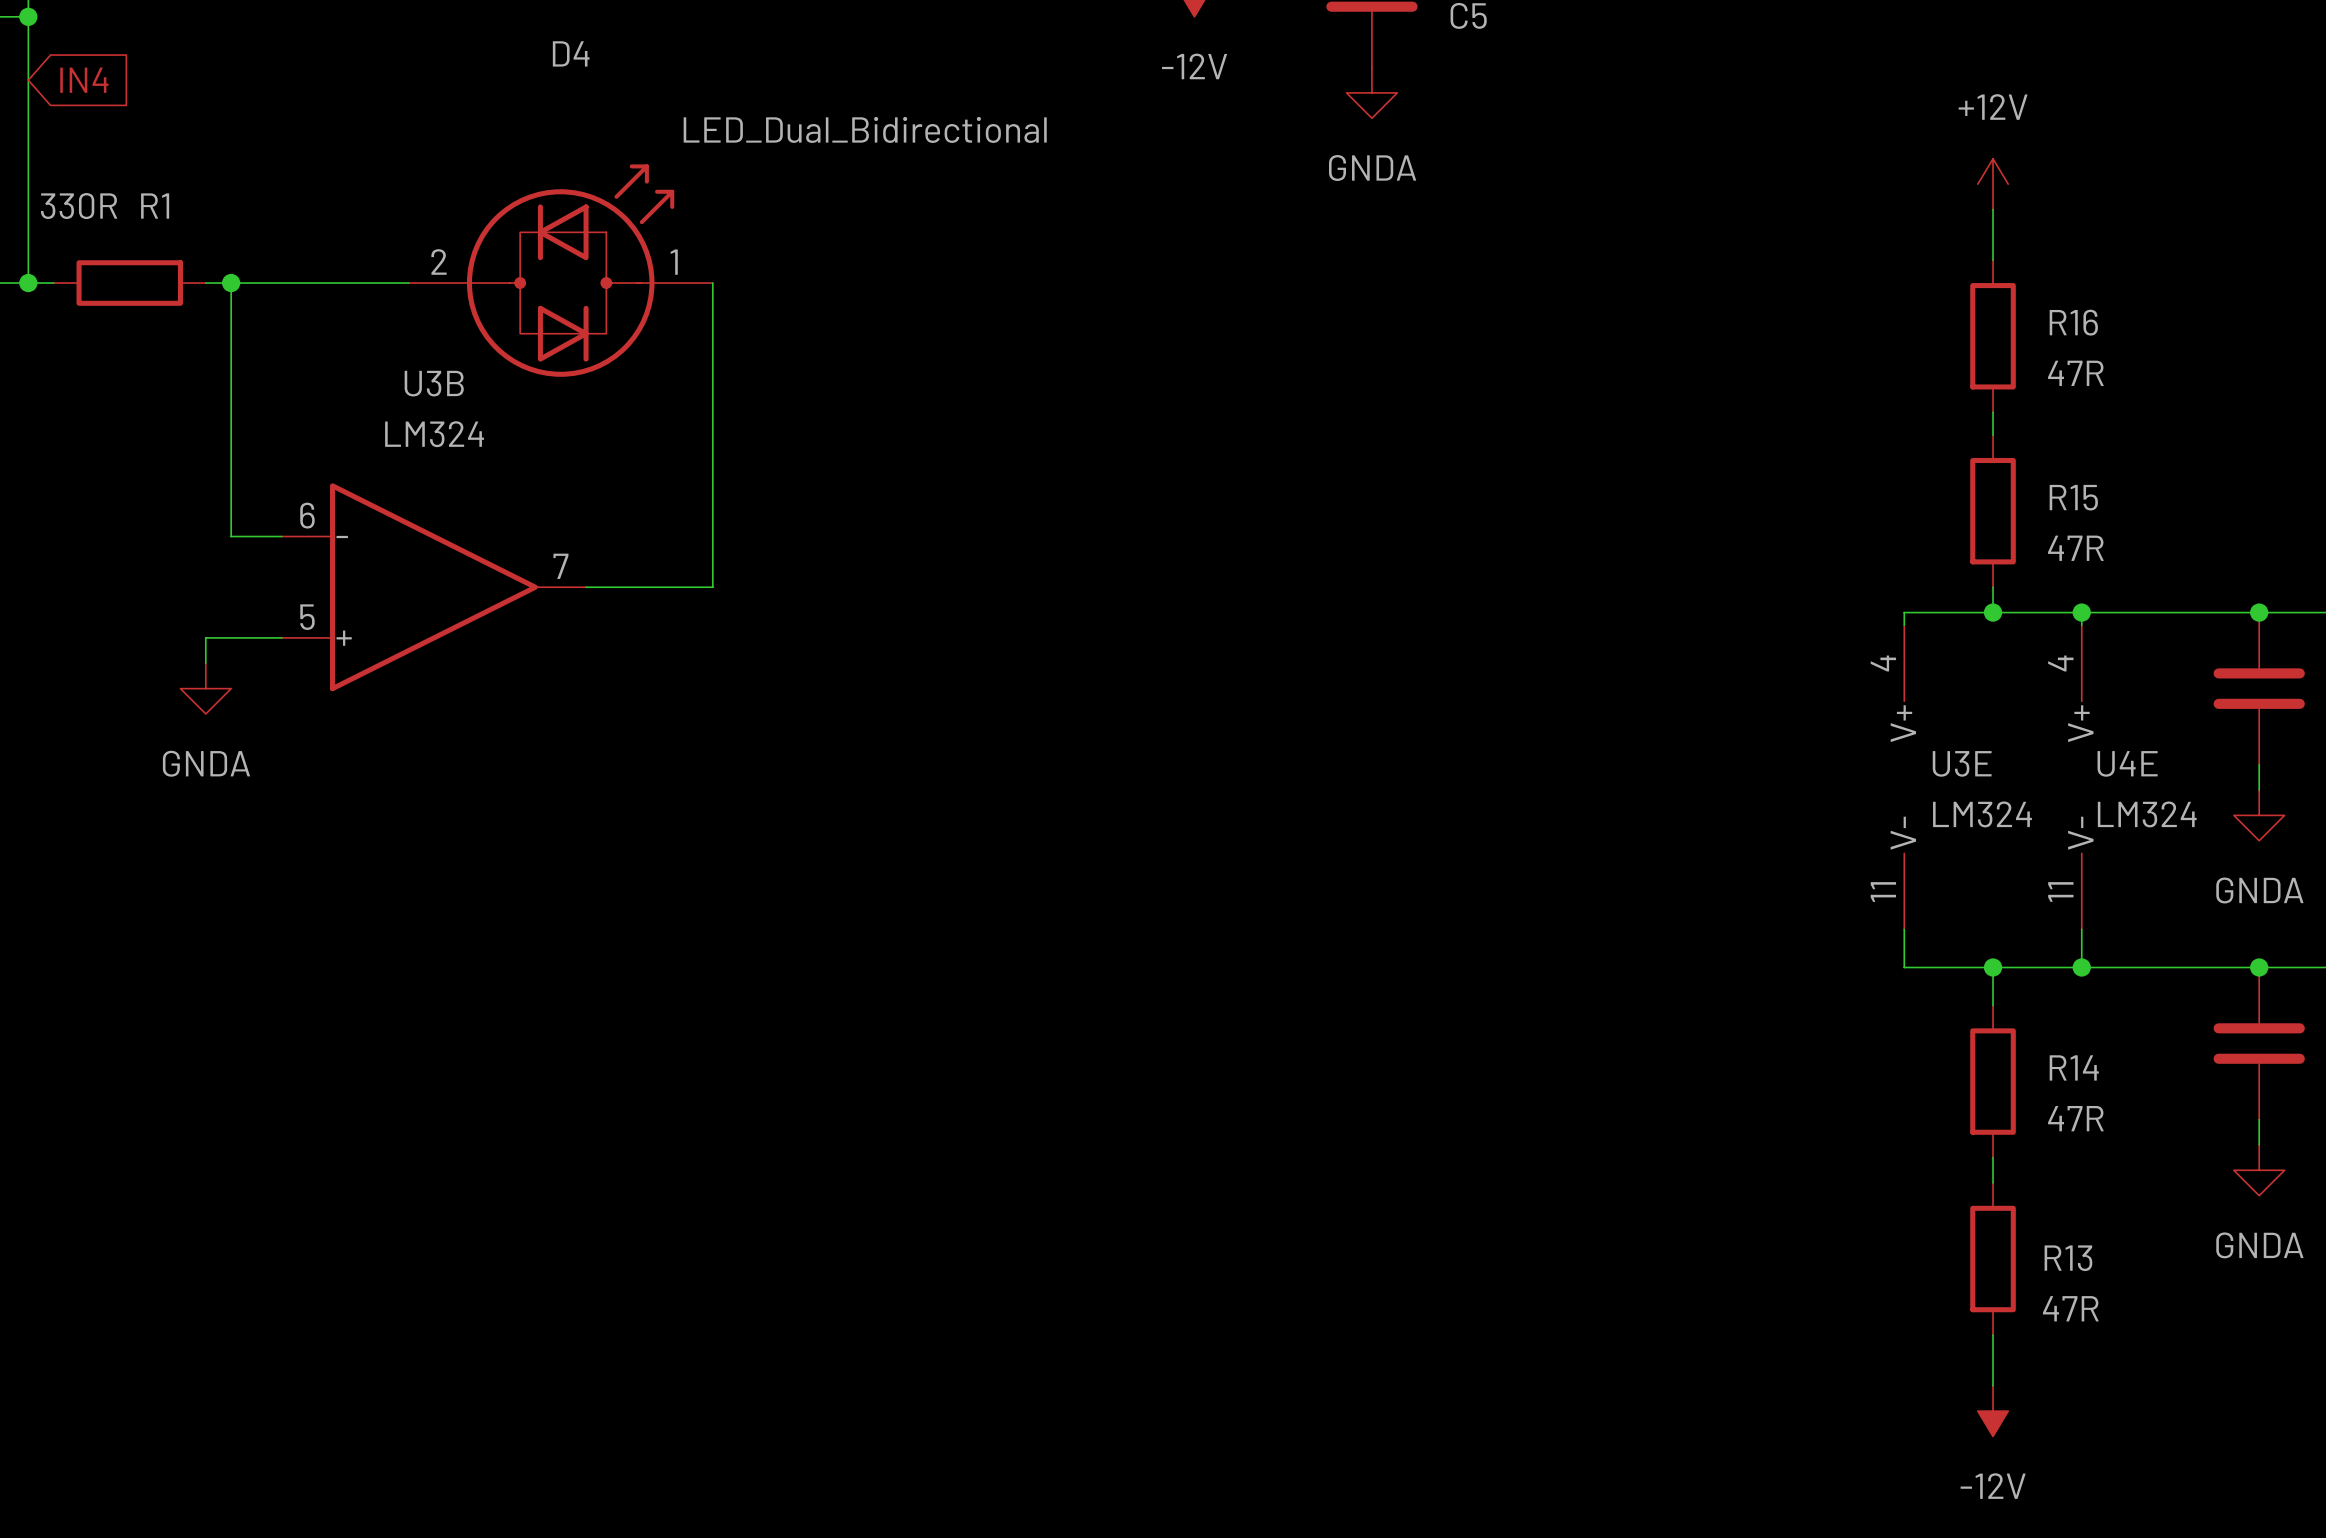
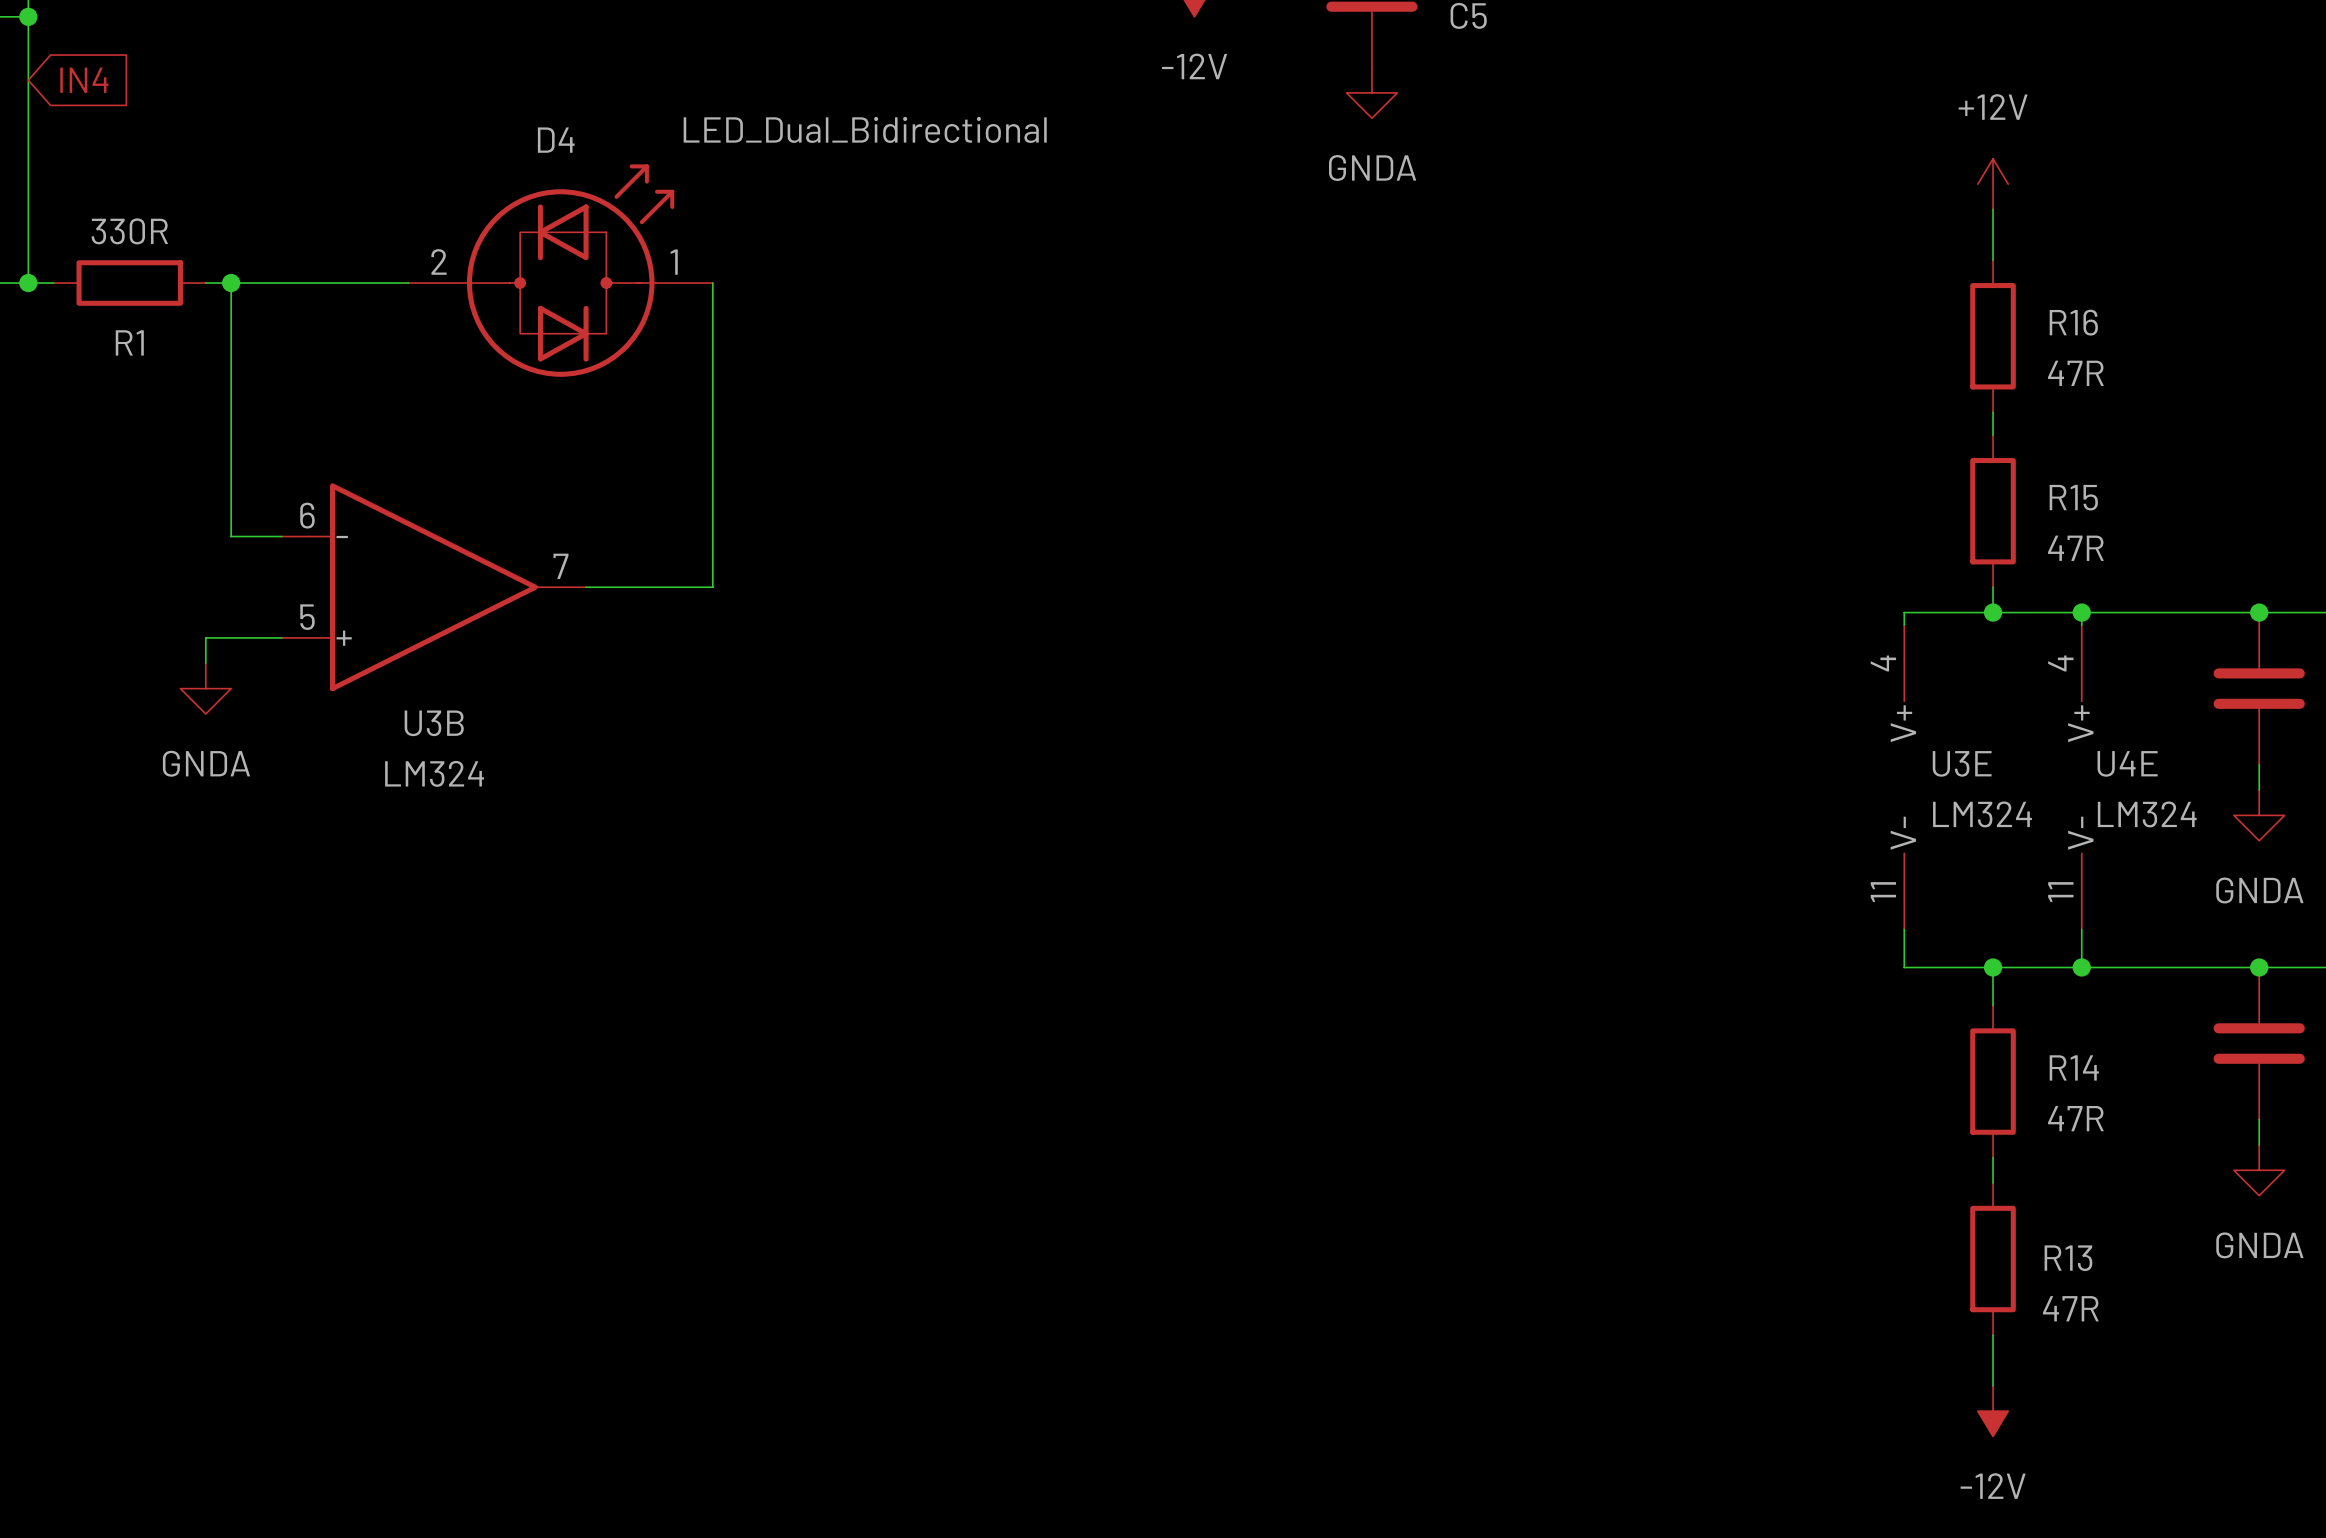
D4 name position: D4 (571, 53) -> D4 (556, 140)
R1 value position: 330R (79, 206) -> 330R (129, 231)
R1 name position: R1 (155, 206) -> R1 (129, 342)
U3B name position: U3B (434, 383) -> U3B (434, 723)
U3B value position: LM324 (434, 434) -> LM324 (434, 773)

